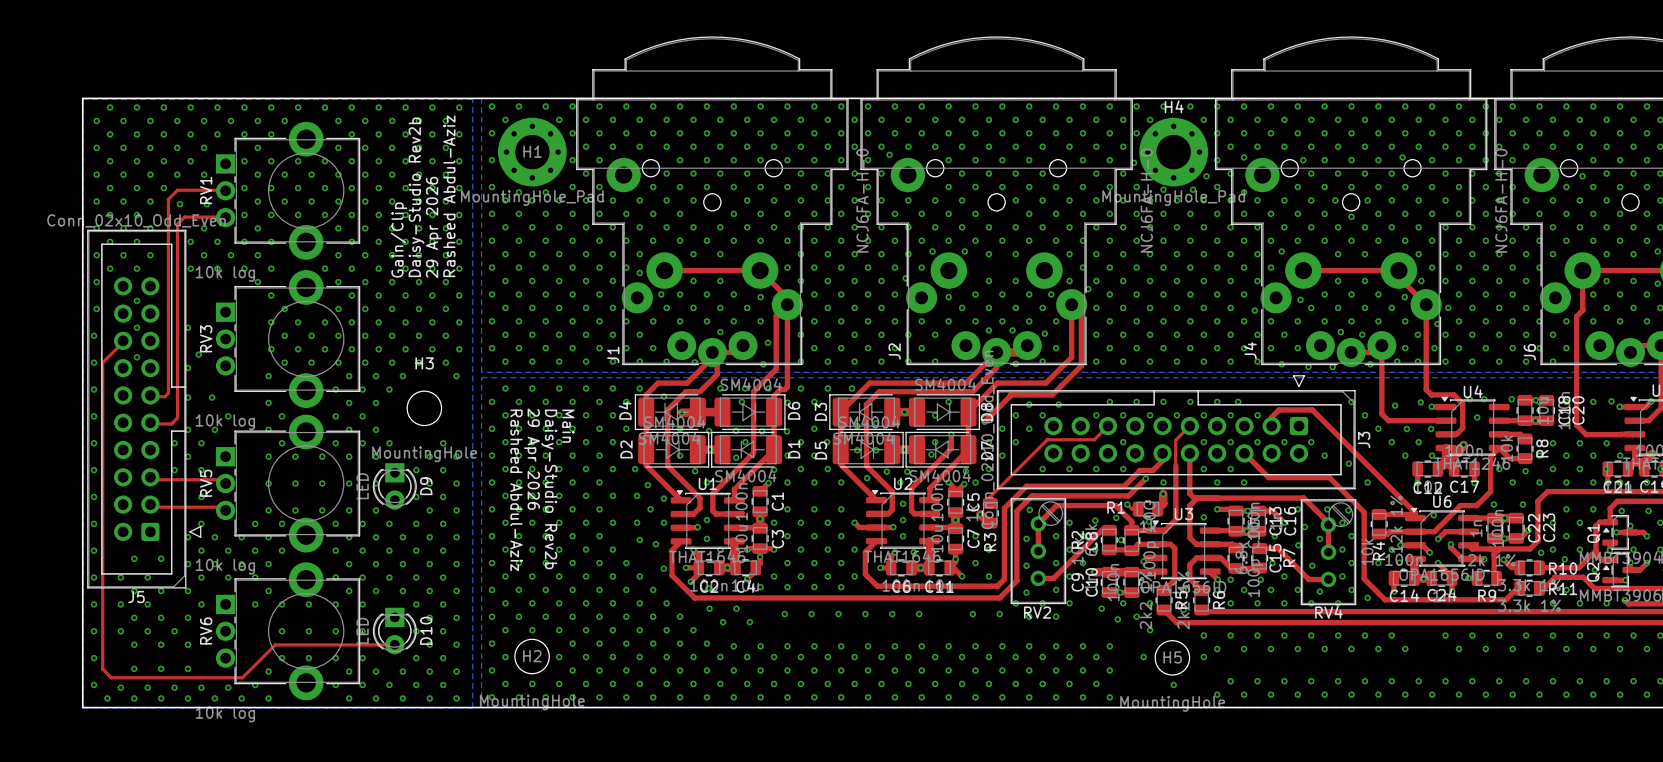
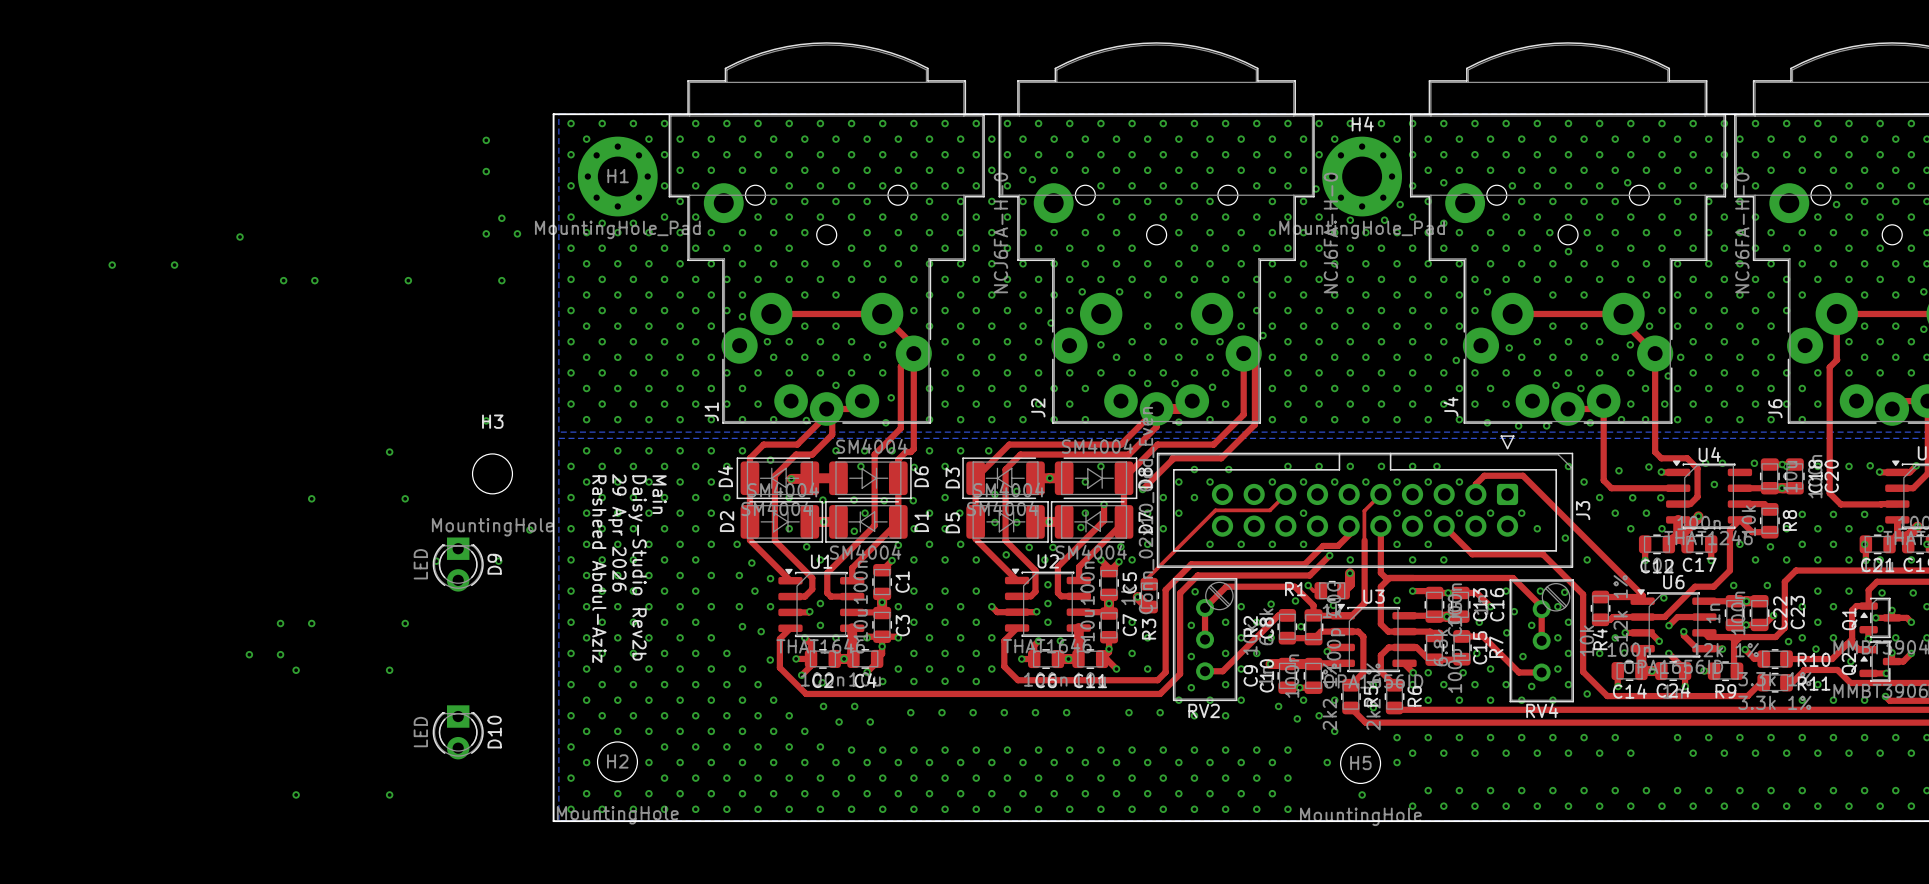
board edge: (477, 98) (82, 98) (82, 707) (477, 707) -> (553, 114) (553, 821)
bottom zone outline: (83, 99) (472, 99) (472, 708) (83, 708) (83, 99) -> none
via: (110, 107) -> none
via: (136, 107) -> none
via: (163, 107) -> none
via: (190, 107) -> none
via: (217, 107) -> none
via: (244, 107) -> none
via: (271, 107) -> none
via: (298, 107) -> none
via: (325, 107) -> none
via: (351, 107) -> none
via: (378, 107) -> none
via: (405, 107) -> none
via: (432, 107) -> none
via: (459, 107) -> none
via: (96, 120) -> none
via: (123, 120) -> none
via: (150, 120) -> none
via: (177, 120) -> none
via: (204, 120) -> none
via: (230, 120) -> none
via: (257, 120) -> none
via: (284, 120) -> none
via: (338, 120) -> none
via: (365, 120) -> none
via: (392, 120) -> none
via: (445, 120) -> none
via: (110, 134) -> none
via: (136, 134) -> none
via: (163, 134) -> none
via: (190, 134) -> none
via: (217, 134) -> none
via: (244, 134) -> none
via: (271, 134) -> none
via: (351, 134) -> none
via: (378, 134) -> none
via: (405, 134) -> none
via: (432, 134) -> none
via: (459, 134) -> none
via: (96, 147) -> none
via: (123, 147) -> none
via: (150, 147) -> none
via: (177, 147) -> none
via: (204, 147) -> none
via: (257, 147) -> none
via: (338, 147) -> none
via: (365, 147) -> none
via: (392, 147) -> none
via: (445, 147) -> none
via: (110, 161) -> none
via: (136, 161) -> none
via: (163, 161) -> none
via: (190, 161) -> none
via: (244, 161) -> none
via: (271, 161) -> none
via: (298, 161) -> none
via: (325, 161) -> none
via: (351, 161) -> none
via: (378, 161) -> none
via: (405, 161) -> none
via: (432, 161) -> none
via: (459, 161) -> none
via: (96, 174) -> none
via: (123, 174) -> none
via: (150, 174) -> none
via: (177, 174) -> none
via: (204, 174) -> none
via: (257, 174) -> none
via: (284, 174) -> none
via: (311, 174) -> none
via: (338, 174) -> none
via: (365, 174) -> none
via: (392, 174) -> none
via: (419, 174) -> none
via: (445, 174) -> none
via: (110, 188) -> none
via: (136, 188) -> none
via: (163, 188) -> none
via: (244, 188) -> none
via: (271, 188) -> none
via: (298, 188) -> none
via: (325, 188) -> none
via: (351, 188) -> none
via: (378, 188) -> none
via: (405, 188) -> none
via: (459, 188) -> none
top track: (225, 190) (177, 190) (168, 199) (168, 393) (165, 396) (150, 396) -> none
RV1: 10k log (288, 190) -> none
text: Rasheed Abdul-Aziz (449, 196) -> none
text: Daisy-Studio Rev2b (416, 197) -> none
via: (96, 201) -> none
via: (123, 201) -> none
via: (150, 201) -> none
via: (257, 201) -> none
via: (284, 201) -> none
via: (311, 201) -> none
via: (338, 201) -> none
via: (365, 201) -> none
via: (392, 201) -> none
via: (179, 204) -> none
via: (110, 214) -> none
via: (136, 214) -> none
via: (244, 214) -> none
via: (271, 214) -> none
via: (298, 214) -> none
via: (325, 214) -> none
via: (351, 214) -> none
via: (378, 214) -> none
via: (405, 214) -> none
via: (432, 214) -> none
via: (459, 214) -> none
top track: (225, 217) (184, 217) (177, 224) (177, 418) (171, 423) (150, 423) -> none
text: 29 Apr 2026 (433, 227) -> none
via: (123, 228) -> none
via: (204, 228) -> none
via: (257, 228) -> none
via: (338, 228) -> none
via: (365, 228) -> none
via: (392, 228) -> none
via: (419, 228) -> none
via: (445, 228) -> none
text: Gain/Clip (399, 240) -> none
via: (110, 241) -> none
via: (136, 241) -> none
via: (190, 241) -> none
via: (217, 241) -> none
via: (378, 241) -> none
via: (405, 241) -> none
via: (459, 241) -> none
via: (96, 255) -> none
via: (123, 255) -> none
via: (150, 255) -> none
via: (204, 255) -> none
via: (230, 255) -> none
via: (257, 255) -> none
via: (338, 255) -> none
via: (365, 255) -> none
via: (392, 255) -> none
via: (419, 255) -> none
via: (445, 255) -> none
via: (110, 268) -> none
via: (136, 268) -> none
via: (190, 268) -> none
via: (217, 268) -> none
via: (244, 268) -> none
via: (271, 268) -> none
via: (325, 268) -> none
via: (351, 268) -> none
via: (378, 268) -> none
via: (405, 268) -> none
via: (432, 268) -> none
via: (459, 268) -> none
via: (96, 282) -> none
via: (257, 282) -> none
via: (338, 282) -> none
via: (365, 282) -> none
via: (392, 282) -> none
via: (419, 282) -> none
via: (445, 282) -> none
via: (271, 295) -> none
via: (351, 295) -> none
via: (378, 295) -> none
via: (405, 295) -> none
via: (432, 295) -> none
via: (459, 295) -> none
via: (136, 300) -> none
via: (96, 308) -> none
via: (284, 308) -> none
via: (338, 308) -> none
via: (365, 308) -> none
via: (392, 308) -> none
via: (419, 308) -> none
via: (445, 308) -> none
via: (271, 322) -> none
via: (298, 322) -> none
via: (325, 322) -> none
via: (351, 322) -> none
via: (378, 322) -> none
via: (405, 322) -> none
via: (432, 322) -> none
via: (459, 322) -> none
via: (136, 327) -> none
via: (188, 327) -> none
via: (94, 335) -> none
via: (284, 335) -> none
via: (311, 335) -> none
via: (338, 335) -> none
via: (365, 335) -> none
via: (392, 335) -> none
via: (419, 335) -> none
via: (445, 335) -> none
RV3: 10k log (288, 339) -> none
top track: (123, 342) (102, 362) (102, 669) (111, 677) (242, 677) (275, 644) (393, 644) -> none
via: (271, 349) -> none
via: (298, 349) -> none
via: (325, 349) -> none
via: (351, 349) -> none
via: (378, 349) -> none
via: (405, 349) -> none
via: (432, 349) -> none
via: (459, 349) -> none
via: (198, 354) -> none
via: (136, 357) -> none
via: (94, 362) -> none
via: (284, 362) -> none
via: (311, 362) -> none
via: (338, 362) -> none
via: (365, 362) -> none
via: (392, 362) -> none
via: (445, 362) -> none
via: (188, 368) -> none
via: (268, 376) -> none
via: (349, 376) -> none
via: (376, 376) -> none
via: (402, 376) -> none
via: (456, 376) -> none
via: (94, 389) -> none
via: (362, 389) -> none
via: (389, 389) -> none
via: (188, 397) -> none
via: (212, 397) -> none
via: (268, 402) -> none
via: (349, 402) -> none
via: (376, 402) -> none
J5: Conn_02x10_Odd_Even (144, 409) -> none
via: (94, 416) -> none
via: (228, 416) -> none
via: (282, 416) -> none
via: (335, 416) -> none
via: (362, 416) -> none
via: (188, 429) -> none
via: (214, 429) -> none
via: (376, 429) -> none
via: (94, 443) -> none
via: (174, 443) -> none
via: (201, 443) -> none
via: (282, 443) -> none
via: (335, 443) -> none
via: (362, 443) -> none
via: (389, 443) -> none
via: (443, 443) -> none
via: (188, 456) -> none
via: (268, 456) -> none
via: (295, 456) -> none
via: (322, 456) -> none
via: (349, 456) -> none
via: (376, 456) -> none
via: (429, 456) -> none
via: (94, 470) -> none
via: (174, 470) -> none
via: (201, 470) -> none
via: (416, 470) -> none
via: (443, 470) -> none
top track: (151, 479) (220, 479) -> none
via: (268, 483) -> none
RV5: 10k log (288, 483) -> none
via: (295, 483) -> none
via: (322, 483) -> none
via: (349, 483) -> none
via: (456, 483) -> none
via: (94, 496) -> none
via: (201, 496) -> none
via: (416, 496) -> none
via: (443, 496) -> none
top track: (151, 507) (221, 507) -> none
via: (268, 510) -> none
via: (295, 510) -> none
via: (322, 510) -> none
via: (349, 510) -> none
via: (376, 510) -> none
via: (429, 510) -> none
via: (456, 510) -> none
via: (94, 523) -> none
via: (201, 523) -> none
via: (255, 523) -> none
via: (282, 523) -> none
via: (335, 523) -> none
via: (362, 523) -> none
via: (389, 523) -> none
via: (416, 523) -> none
via: (443, 523) -> none
via: (188, 537) -> none
via: (214, 537) -> none
via: (376, 537) -> none
via: (402, 537) -> none
via: (429, 537) -> none
via: (456, 537) -> none
via: (94, 550) -> none
via: (201, 550) -> none
via: (228, 550) -> none
via: (255, 550) -> none
via: (282, 550) -> none
via: (335, 550) -> none
via: (362, 550) -> none
via: (389, 550) -> none
via: (416, 550) -> none
via: (443, 550) -> none
via: (134, 558) -> none
via: (161, 558) -> none
via: (188, 564) -> none
via: (268, 564) -> none
via: (349, 564) -> none
via: (376, 564) -> none
via: (402, 564) -> none
via: (429, 564) -> none
via: (456, 564) -> none
via: (94, 577) -> none
via: (120, 577) -> none
via: (147, 577) -> none
via: (201, 577) -> none
via: (228, 577) -> none
via: (362, 577) -> none
via: (389, 577) -> none
via: (416, 577) -> none
via: (443, 577) -> none
via: (134, 590) -> none
via: (161, 590) -> none
via: (188, 590) -> none
via: (268, 590) -> none
via: (349, 590) -> none
via: (376, 590) -> none
via: (402, 590) -> none
via: (429, 590) -> none
via: (456, 590) -> none
via: (94, 604) -> none
via: (120, 604) -> none
via: (147, 604) -> none
via: (201, 604) -> none
via: (255, 604) -> none
via: (282, 604) -> none
via: (308, 604) -> none
via: (335, 604) -> none
via: (362, 604) -> none
via: (416, 604) -> none
via: (443, 604) -> none
via: (134, 617) -> none
via: (161, 617) -> none
via: (188, 617) -> none
via: (429, 617) -> none
via: (456, 617) -> none
via: (94, 631) -> none
via: (120, 631) -> none
via: (147, 631) -> none
via: (174, 631) -> none
via: (282, 631) -> none
RV6: 10k log (288, 631) -> none
via: (308, 631) -> none
via: (335, 631) -> none
via: (362, 631) -> none
via: (416, 631) -> none
via: (443, 631) -> none
via: (134, 644) -> none
via: (161, 644) -> none
via: (188, 644) -> none
via: (429, 644) -> none
via: (456, 644) -> none
via: (94, 658) -> none
via: (282, 658) -> none
via: (308, 658) -> none
via: (335, 658) -> none
via: (362, 658) -> none
via: (416, 658) -> none
via: (443, 658) -> none
via: (134, 668) -> none
via: (161, 668) -> none
via: (188, 668) -> none
via: (268, 671) -> none
via: (349, 671) -> none
via: (376, 671) -> none
via: (402, 671) -> none
via: (429, 671) -> none
via: (456, 671) -> none
via: (94, 684) -> none
via: (362, 684) -> none
via: (389, 684) -> none
via: (416, 684) -> none
via: (443, 684) -> none
via: (120, 687) -> none
via: (147, 687) -> none
via: (174, 687) -> none
via: (201, 687) -> none
via: (228, 687) -> none
via: (107, 698) -> none
via: (134, 698) -> none
via: (161, 698) -> none
via: (188, 698) -> none
via: (214, 698) -> none
via: (241, 698) -> none
via: (268, 698) -> none
via: (349, 698) -> none
via: (376, 698) -> none
via: (402, 698) -> none
via: (429, 698) -> none
via: (456, 698) -> none

